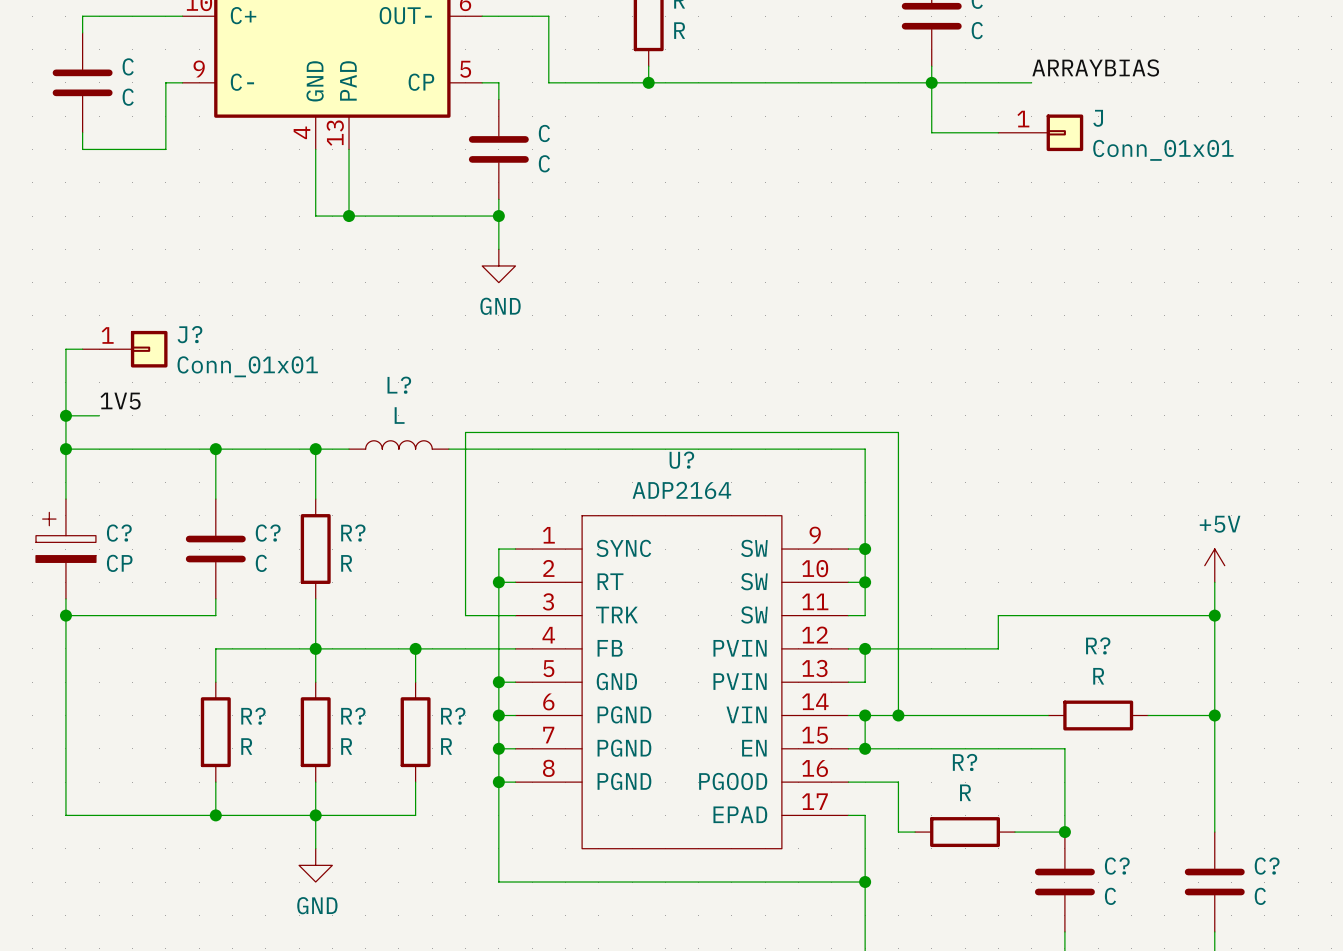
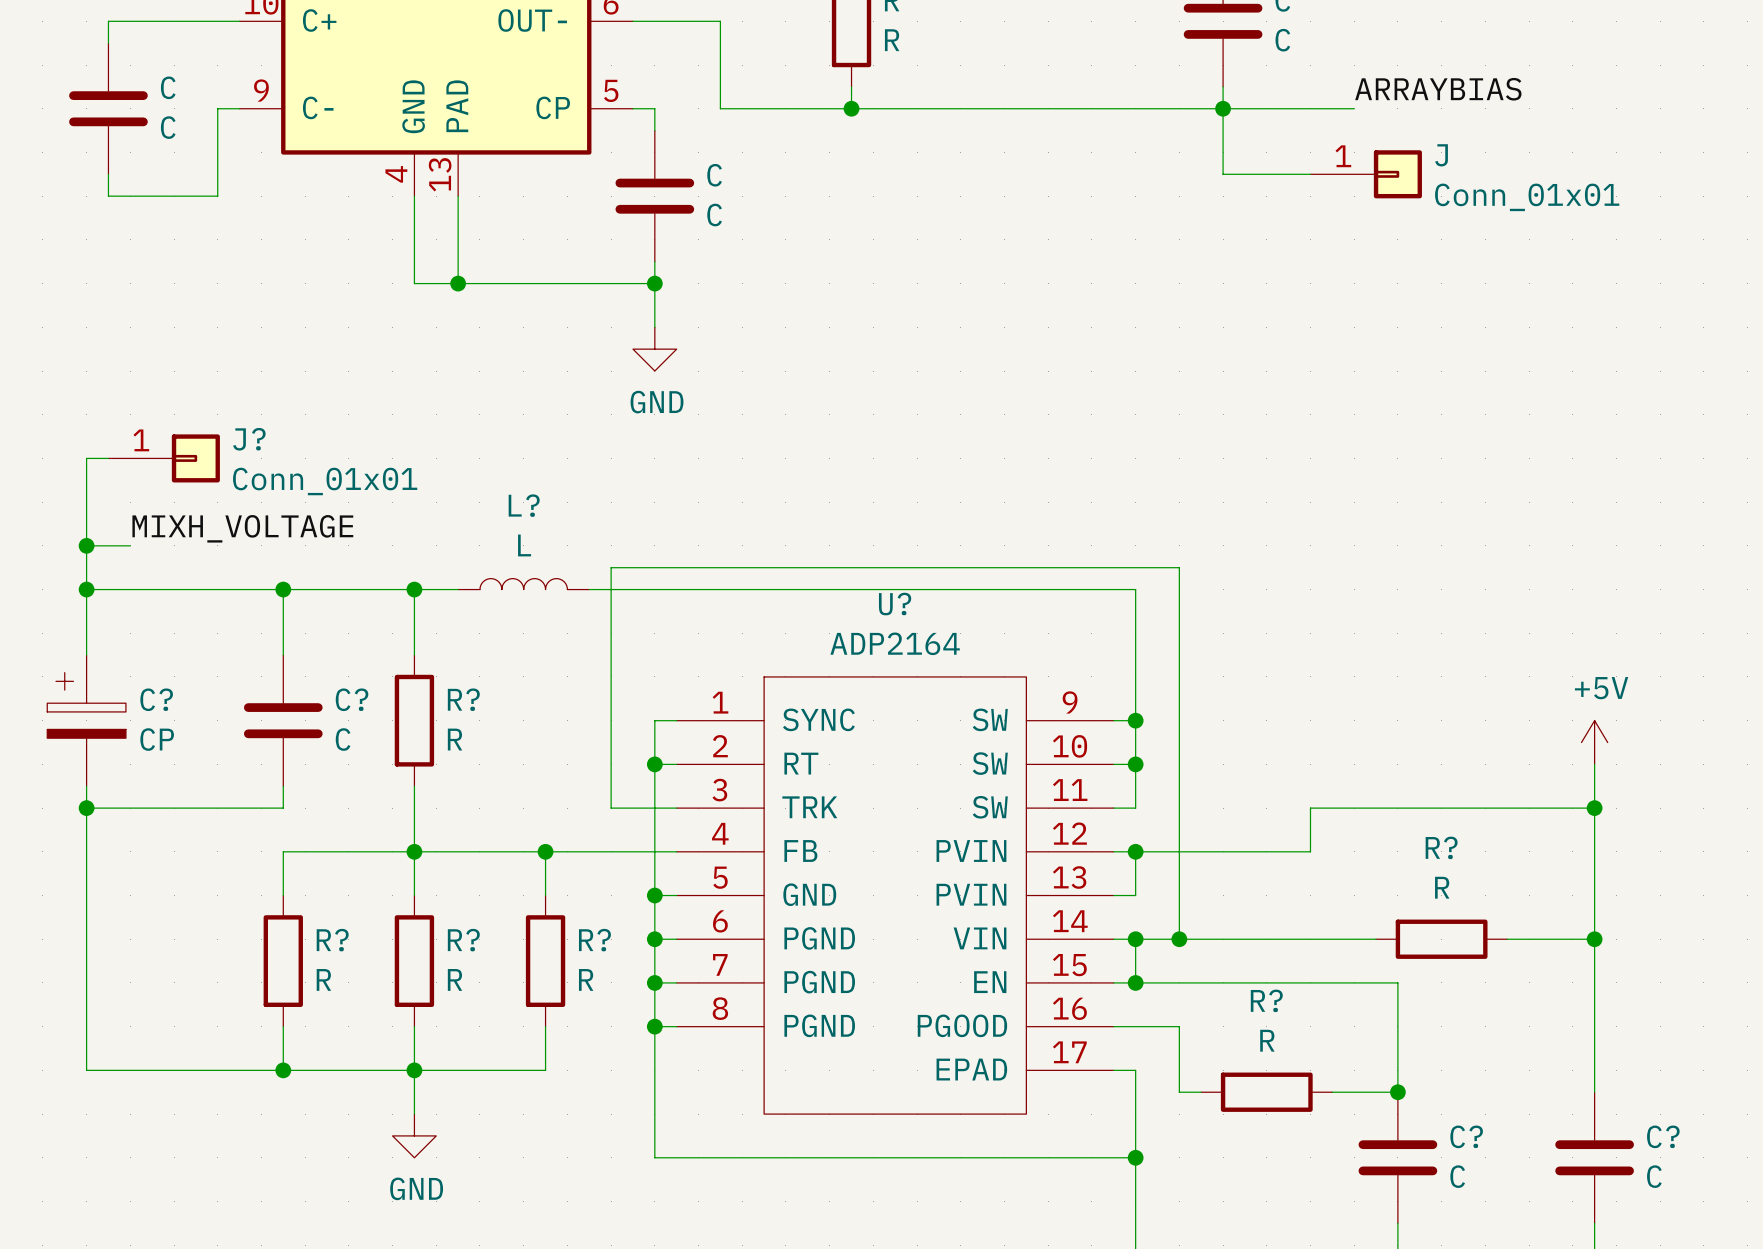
label: 1V5 (120, 401) -> MIXH_VOLTAGE (242, 528)

